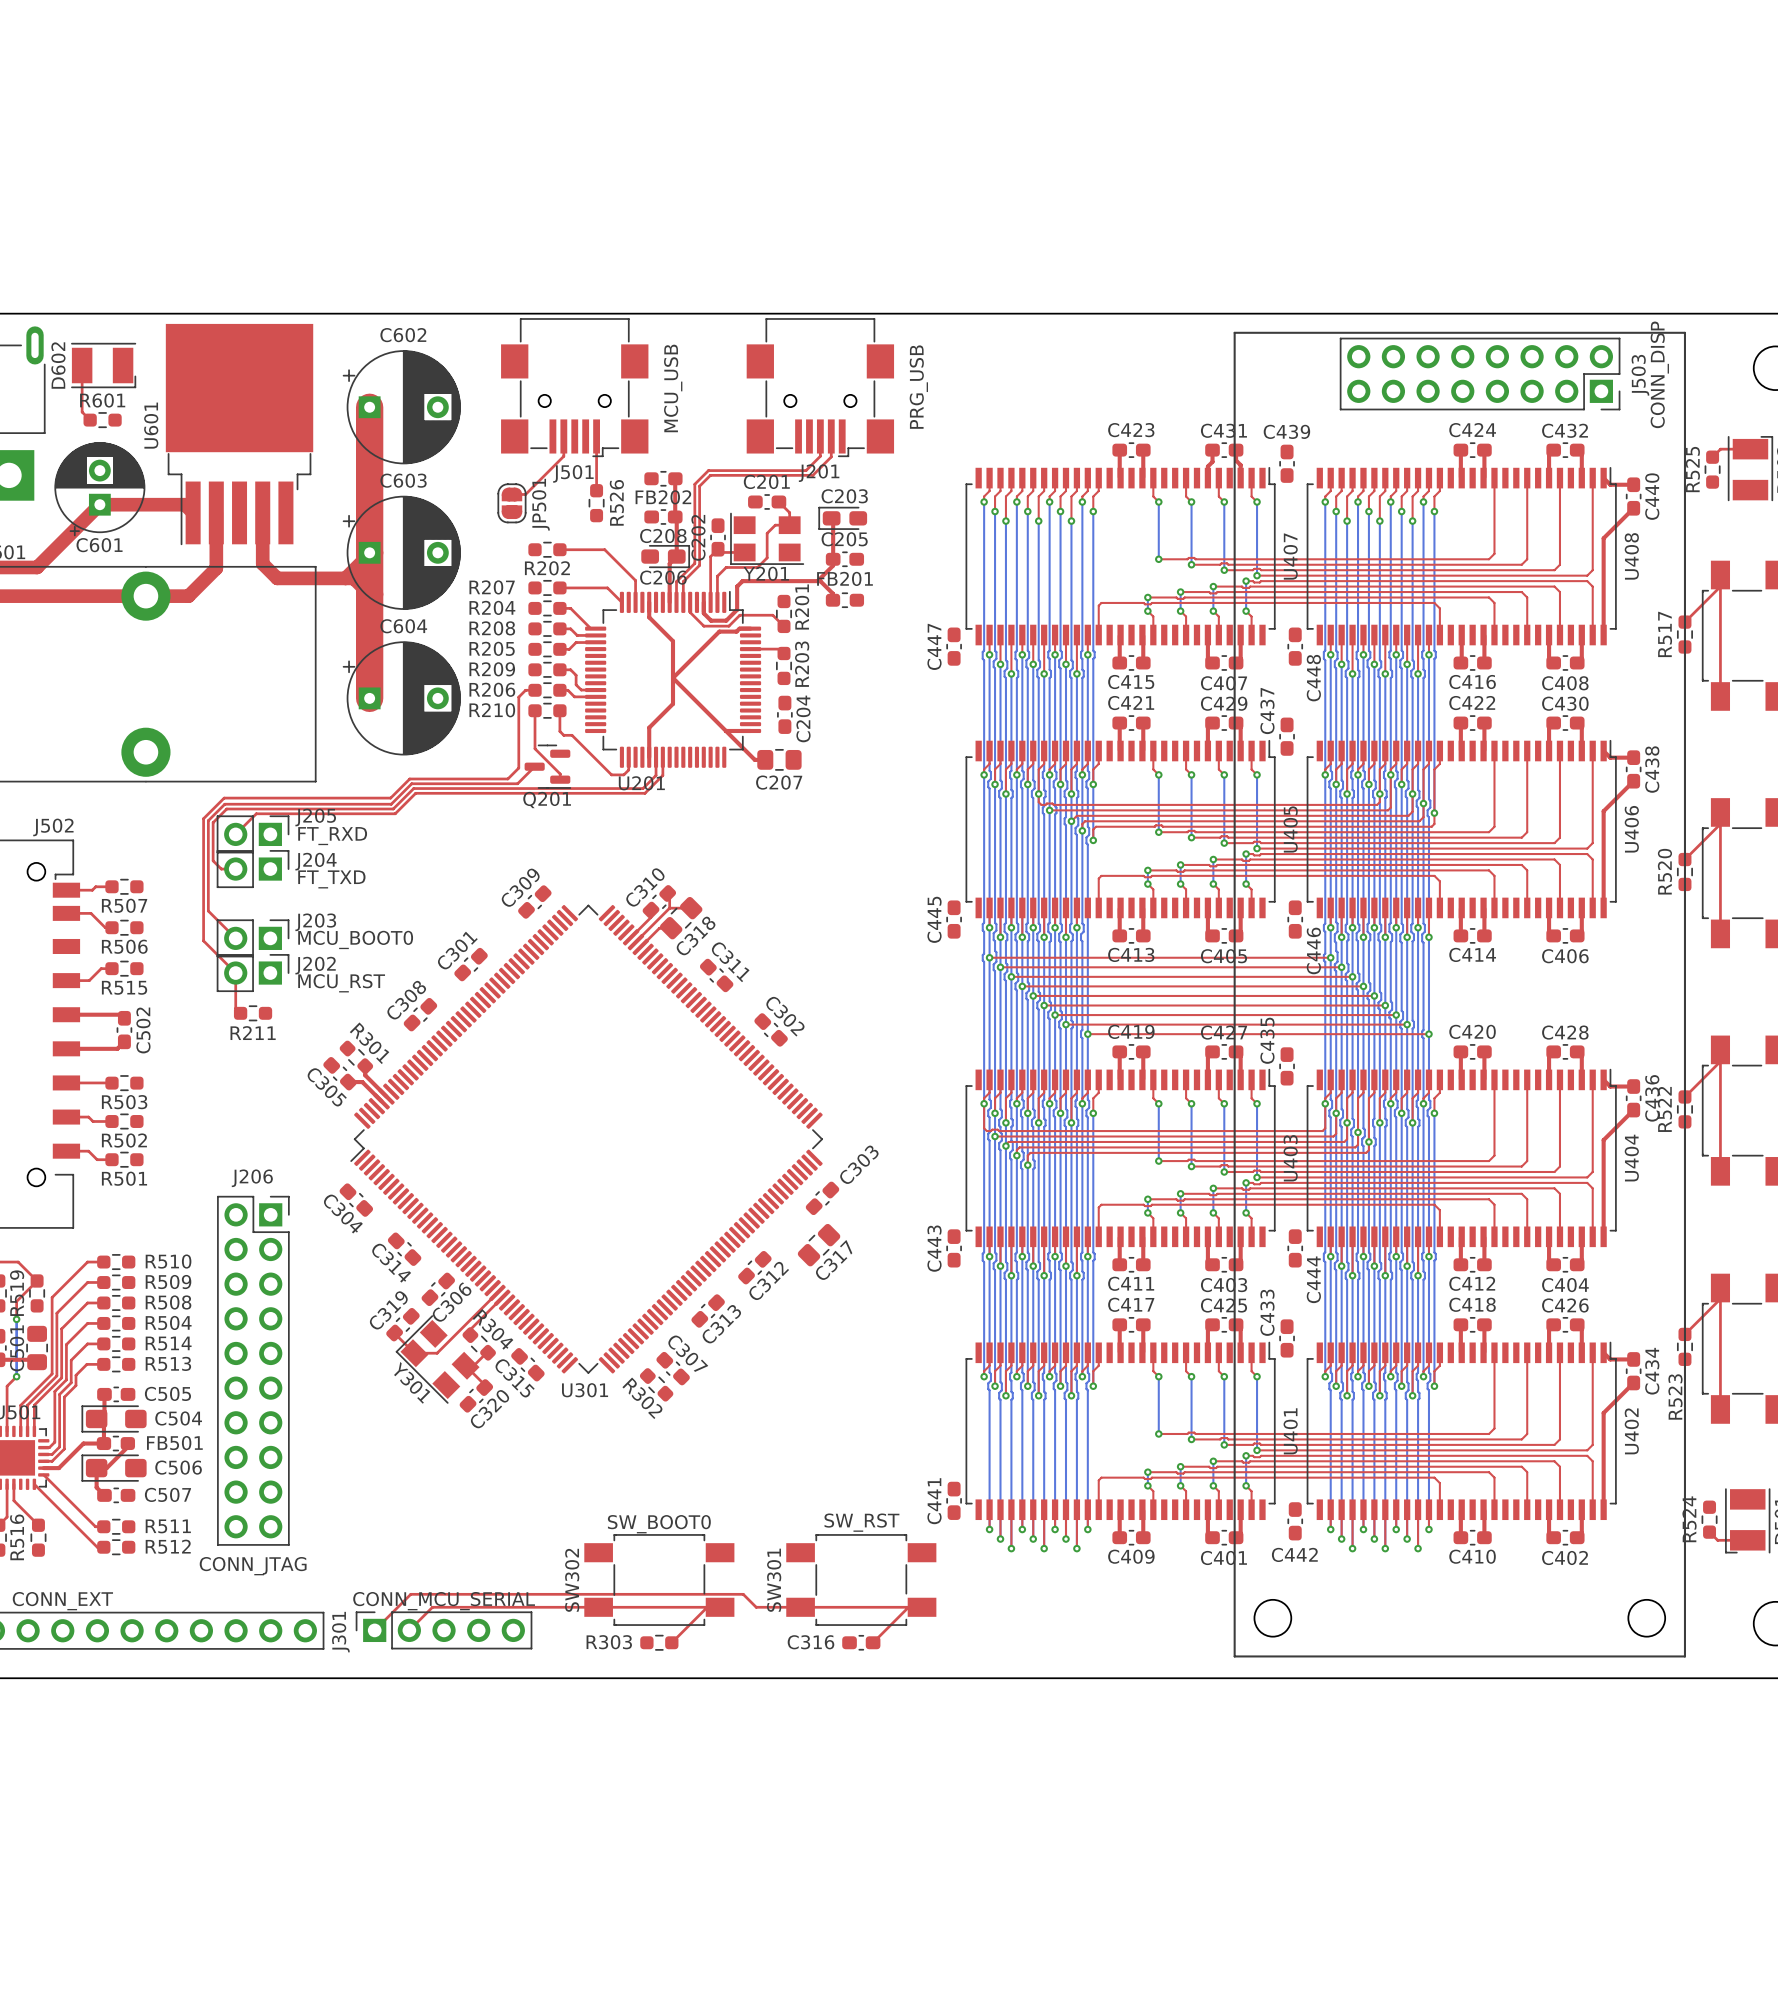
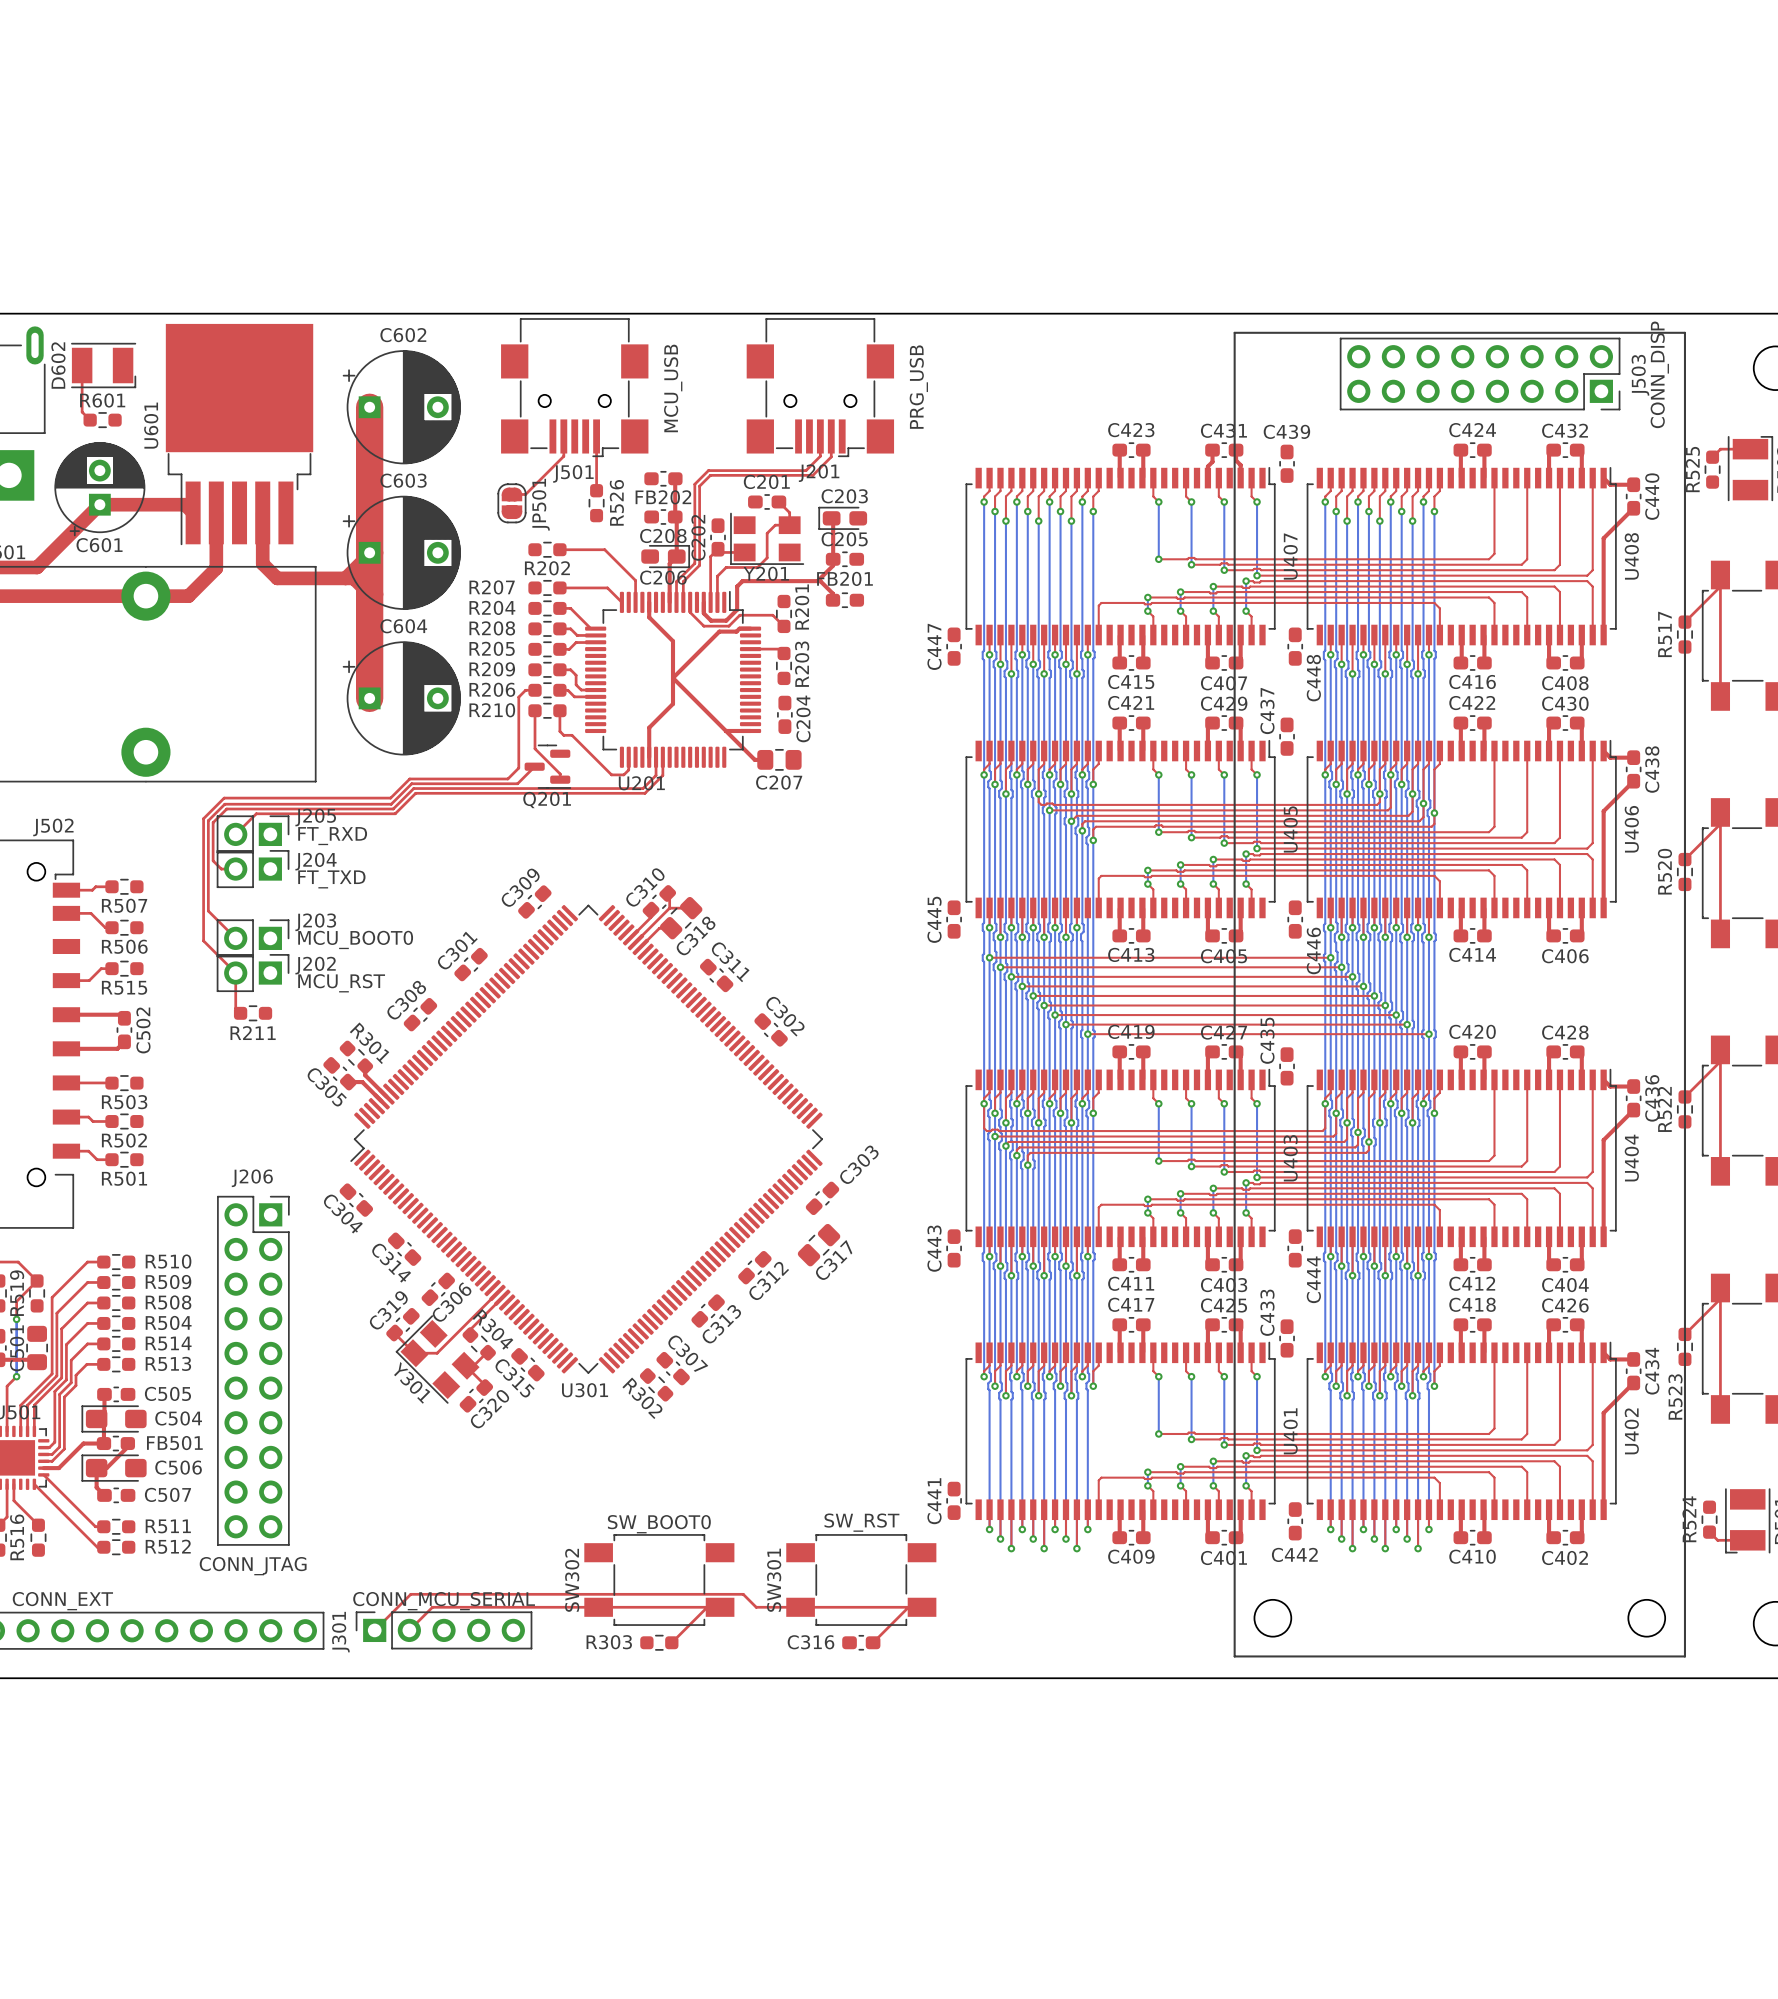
bottom track: none -> (1434, 813) (1434, 1113)
bottom track: none -> (1093, 840) (1093, 1113)

